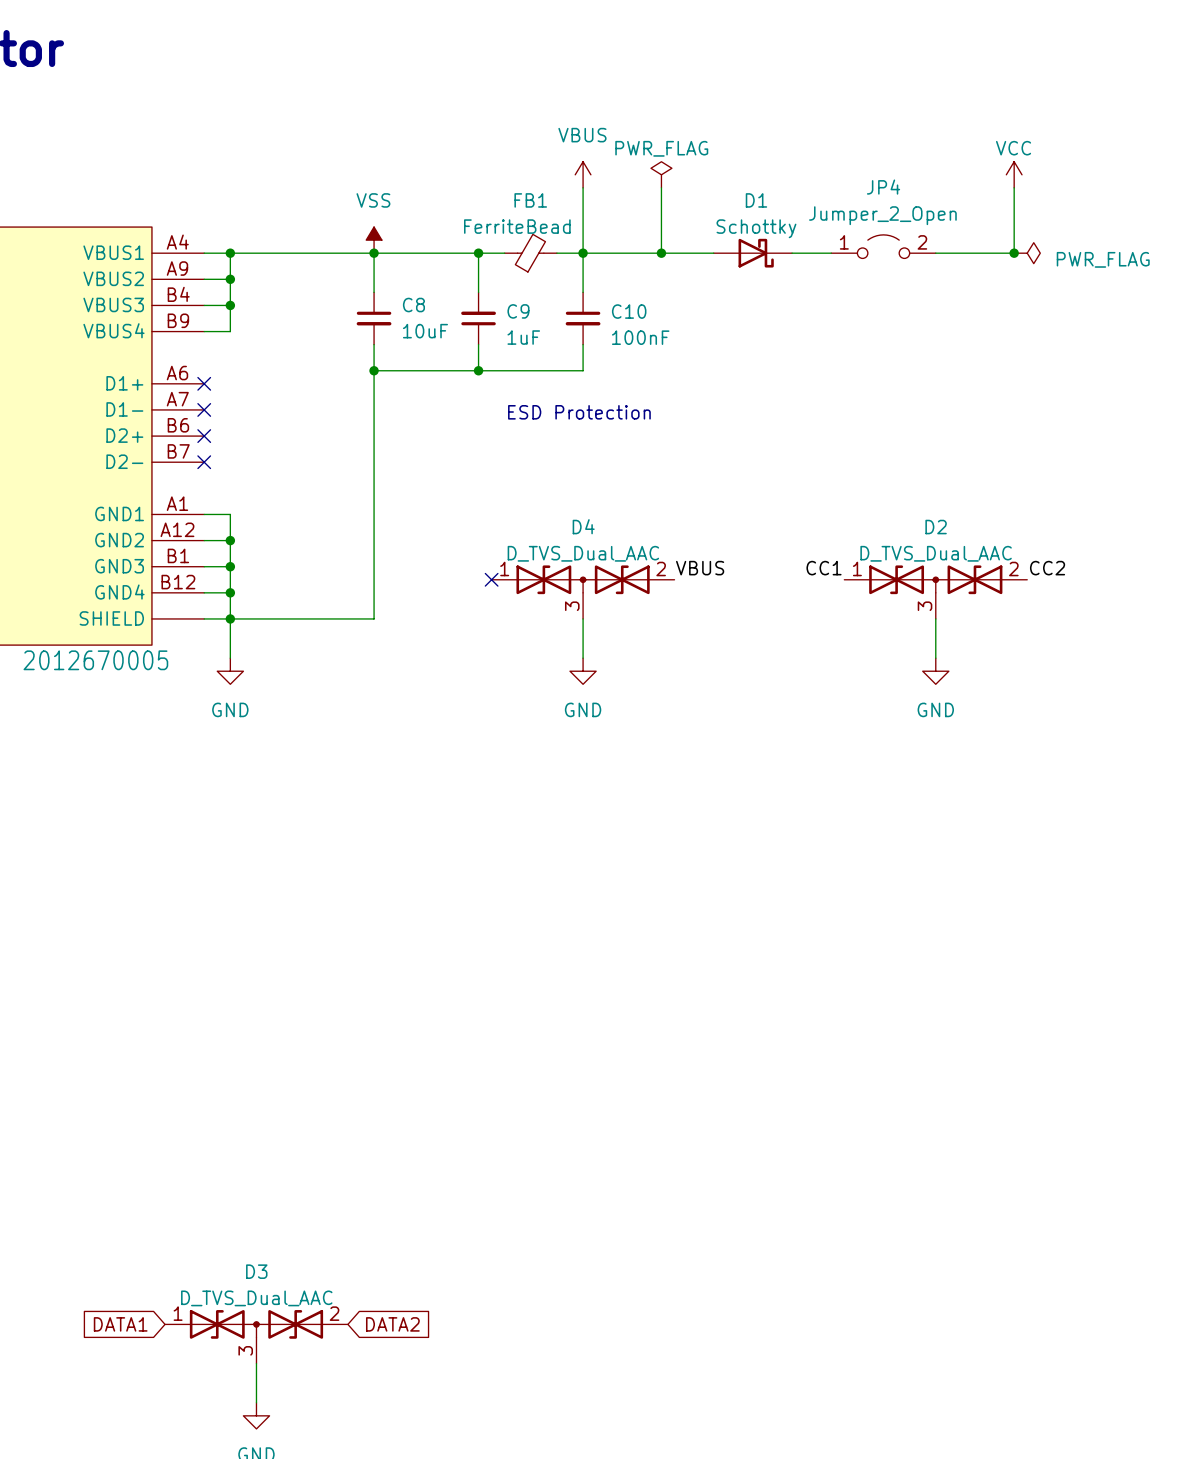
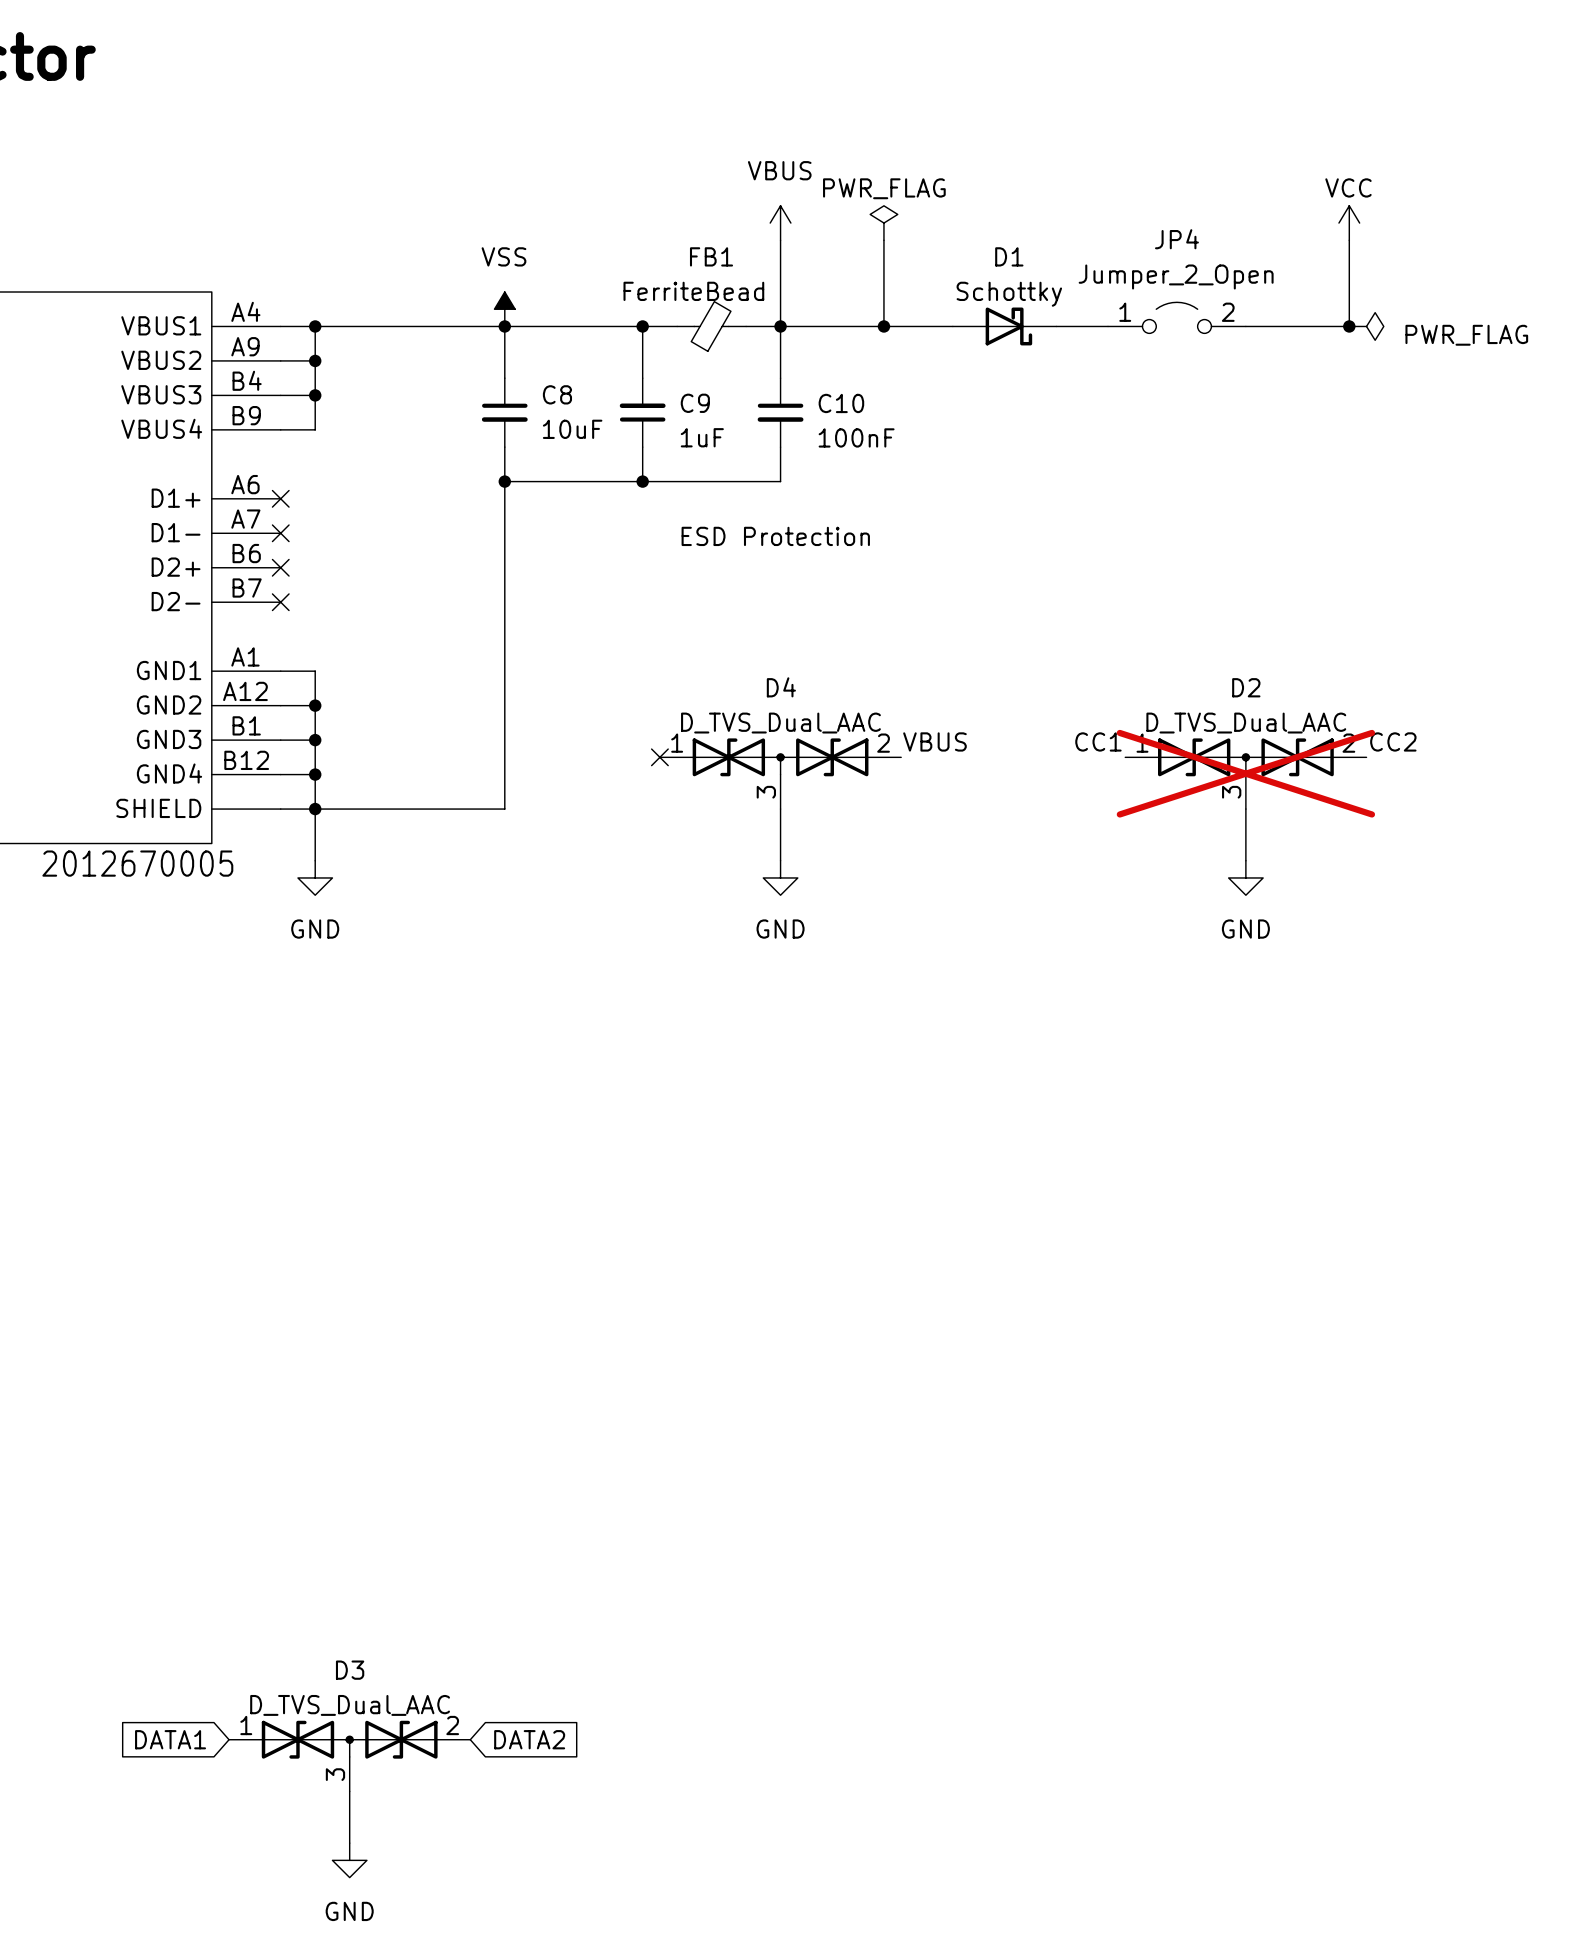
D2 do-not-place cross: none -> (1245, 773)

